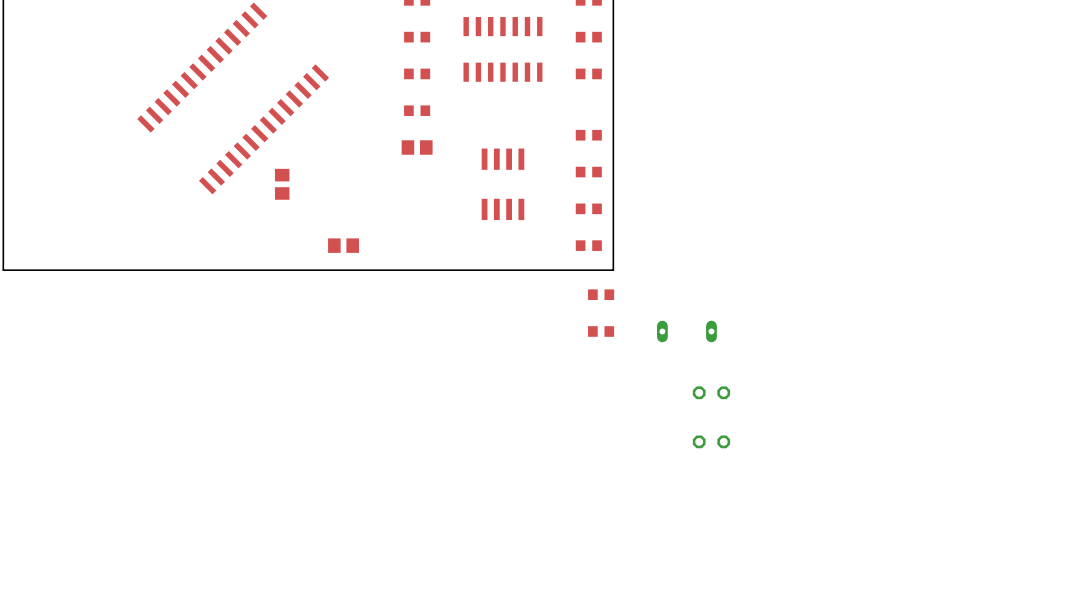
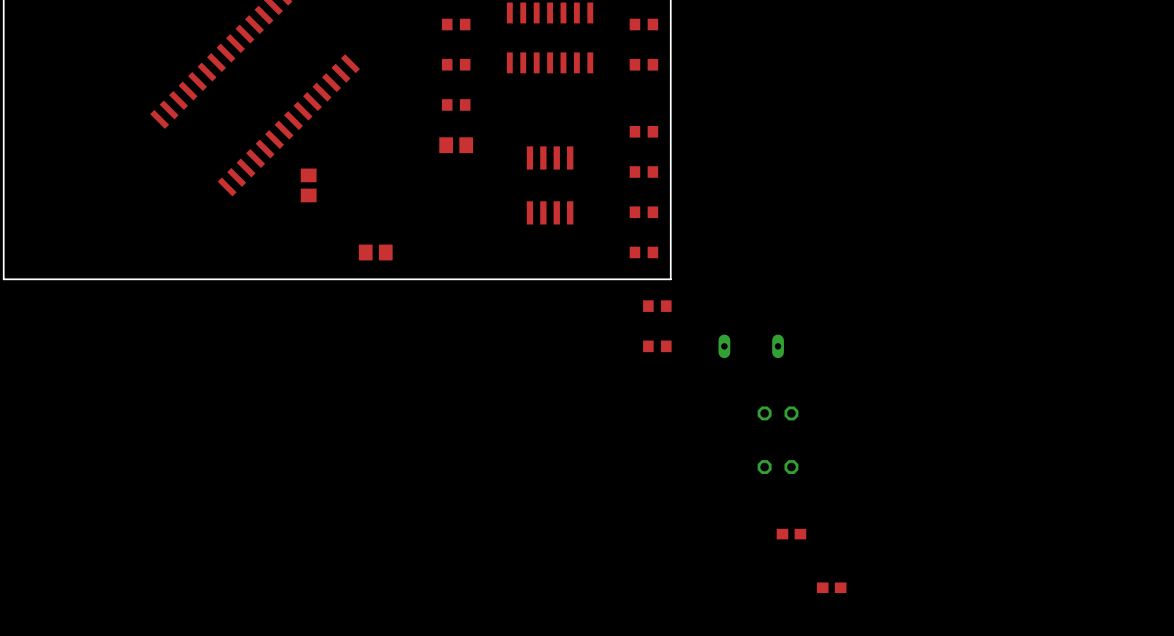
part: none -> (791, 534)
part: none -> (831, 587)

